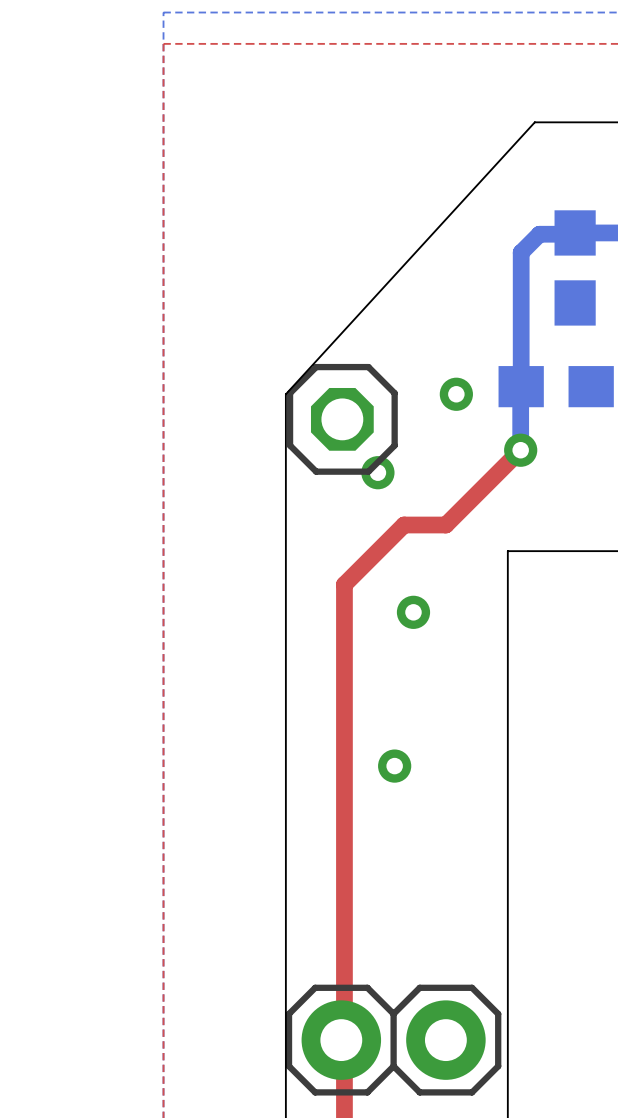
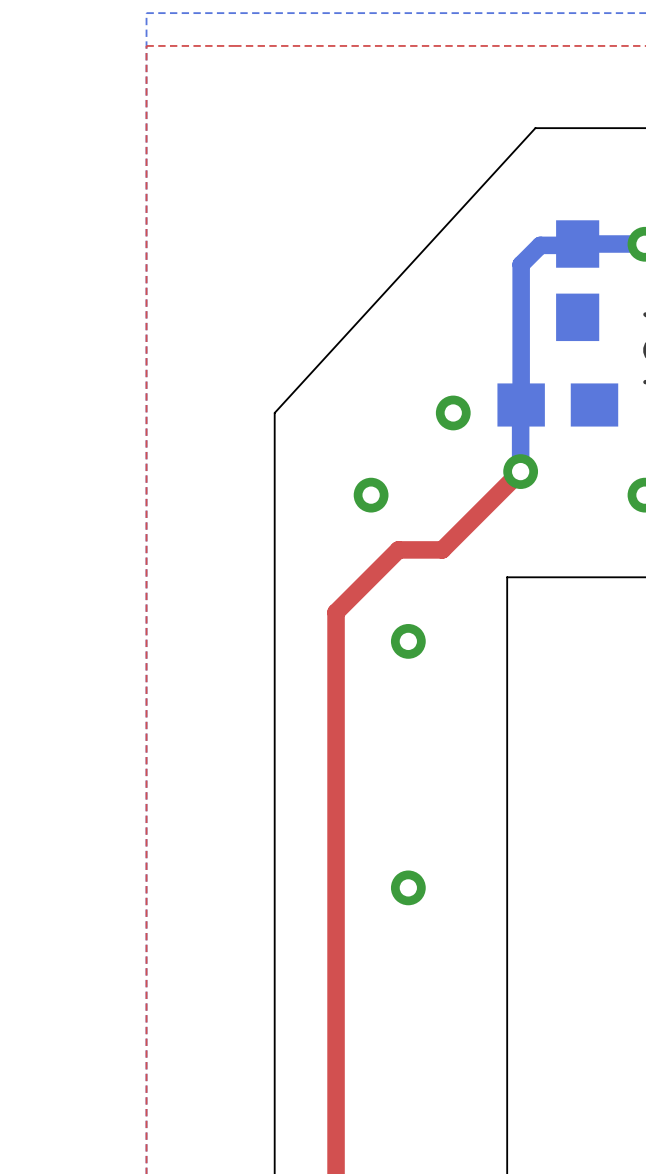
part: (342, 419) -> none
via position: (394, 766) -> (408, 887)
part: (393, 1040) -> none

